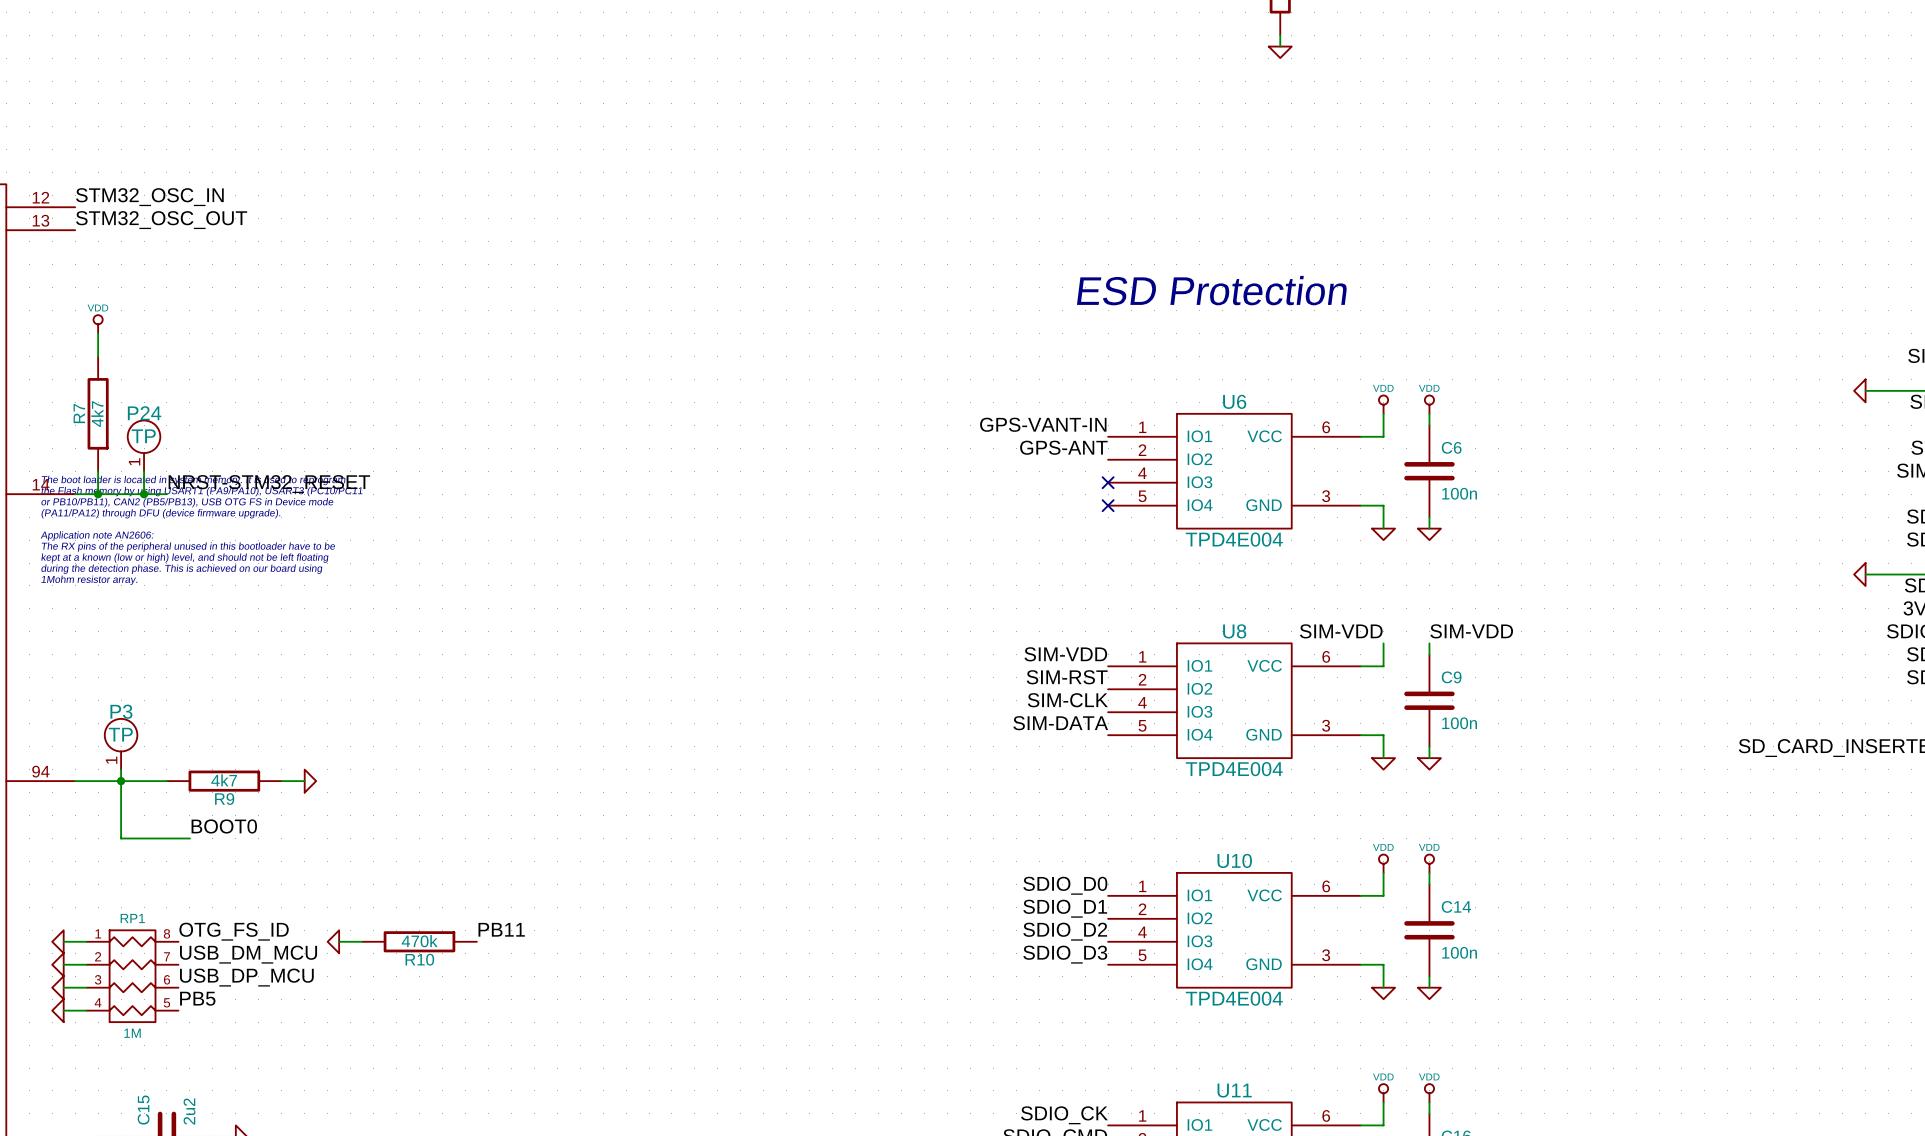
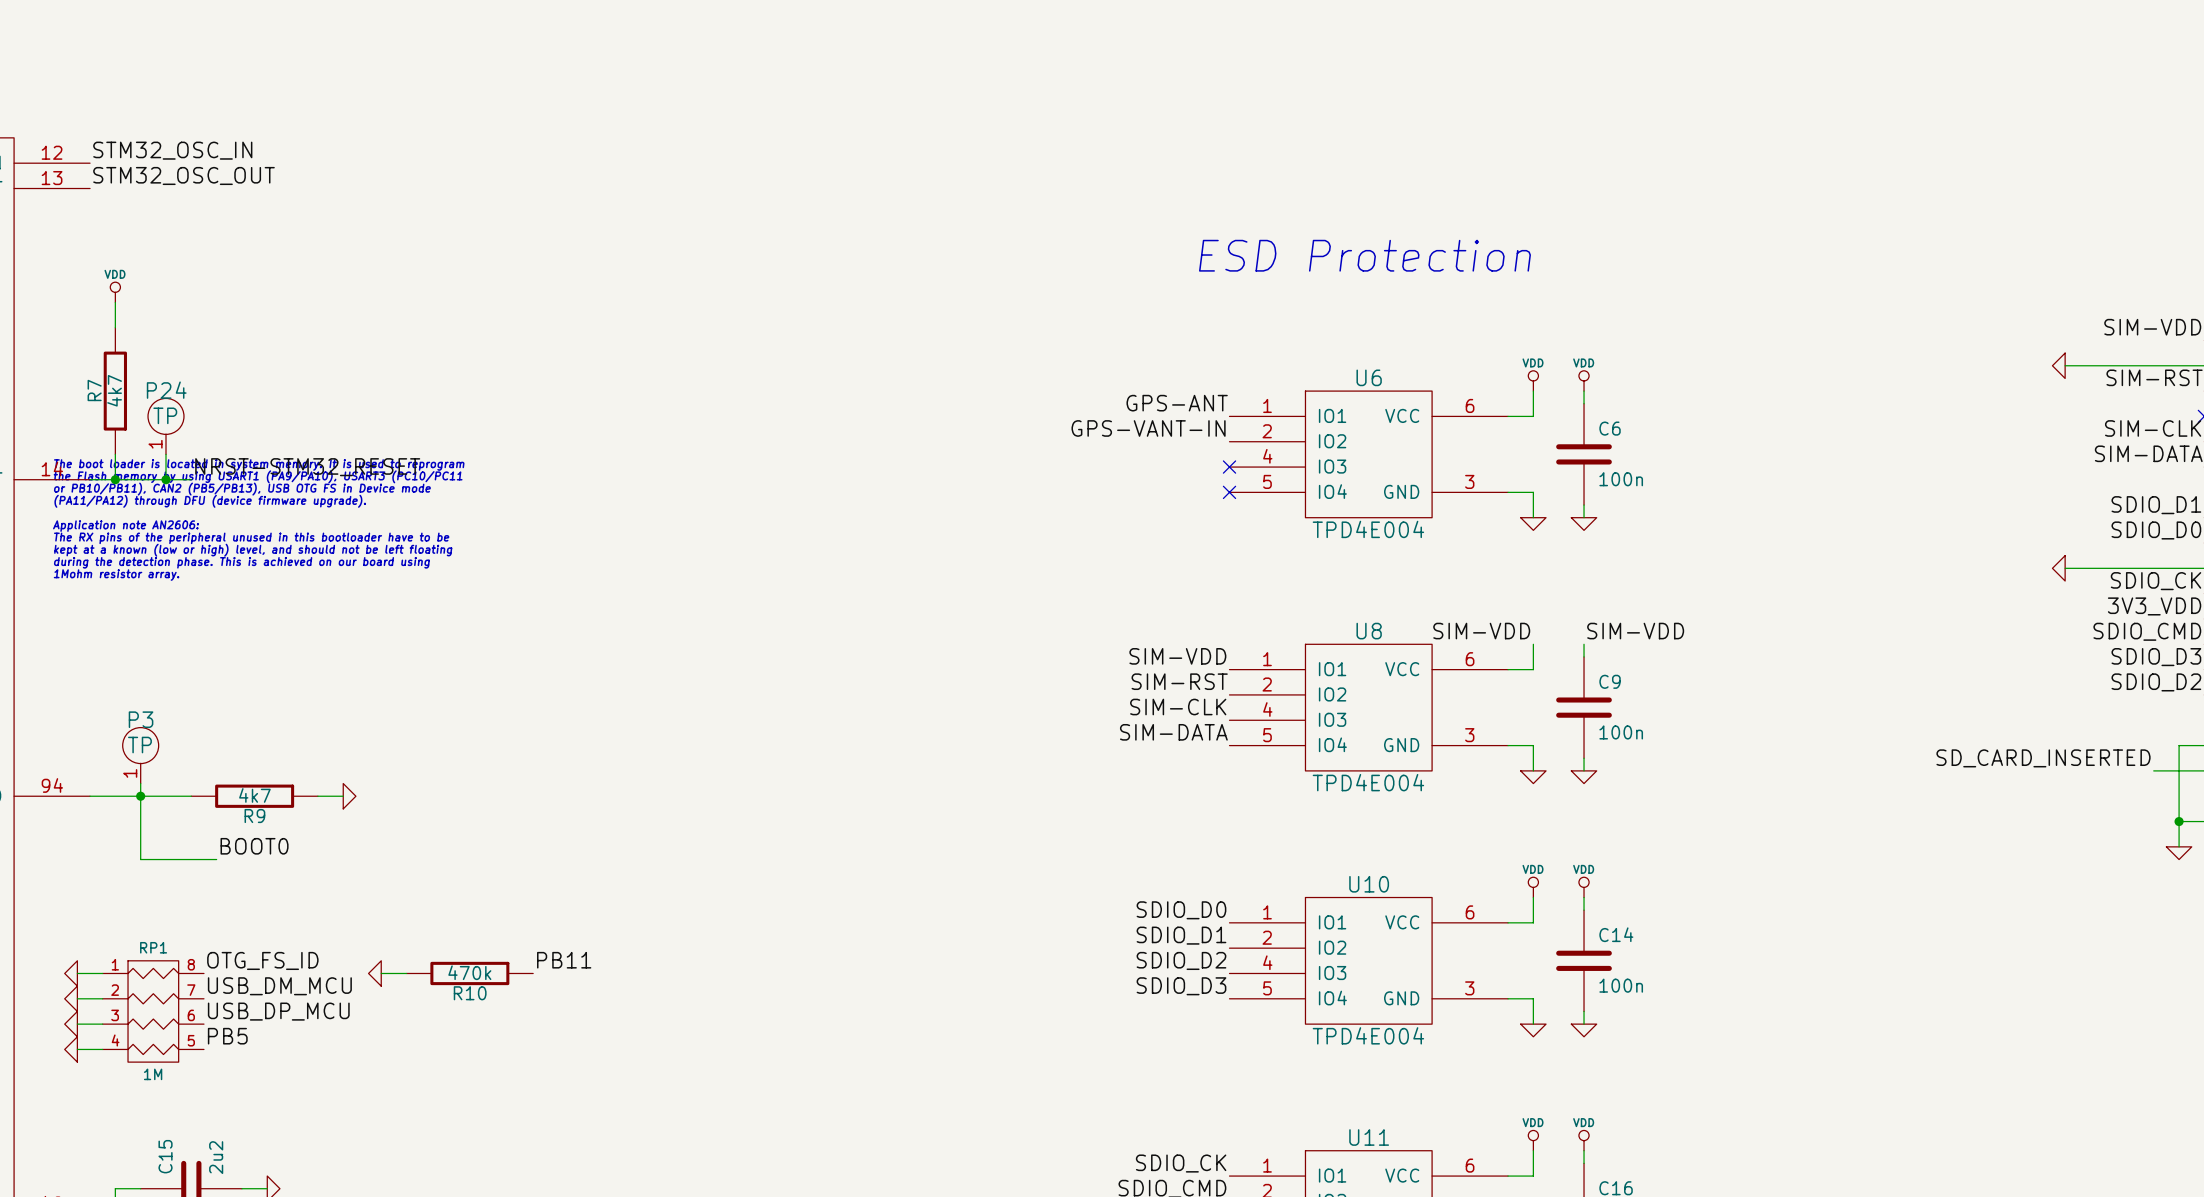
label: GPS-VANT-IN (1043, 424) -> GPS-ANT (1177, 403)
label: GPS-ANT (1063, 447) -> GPS-VANT-IN (1148, 428)

